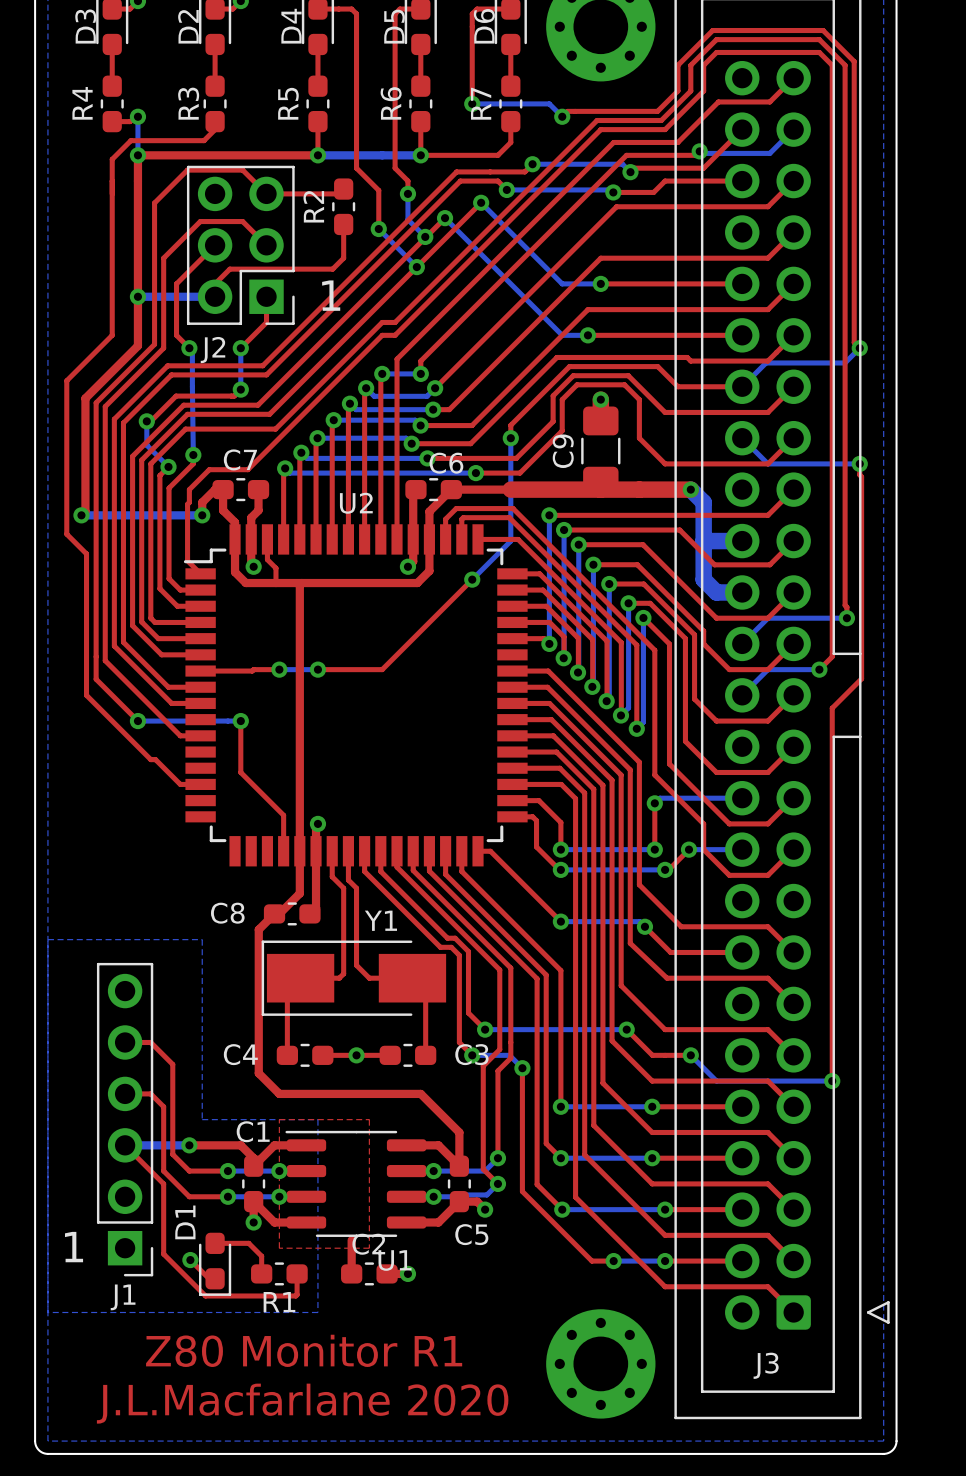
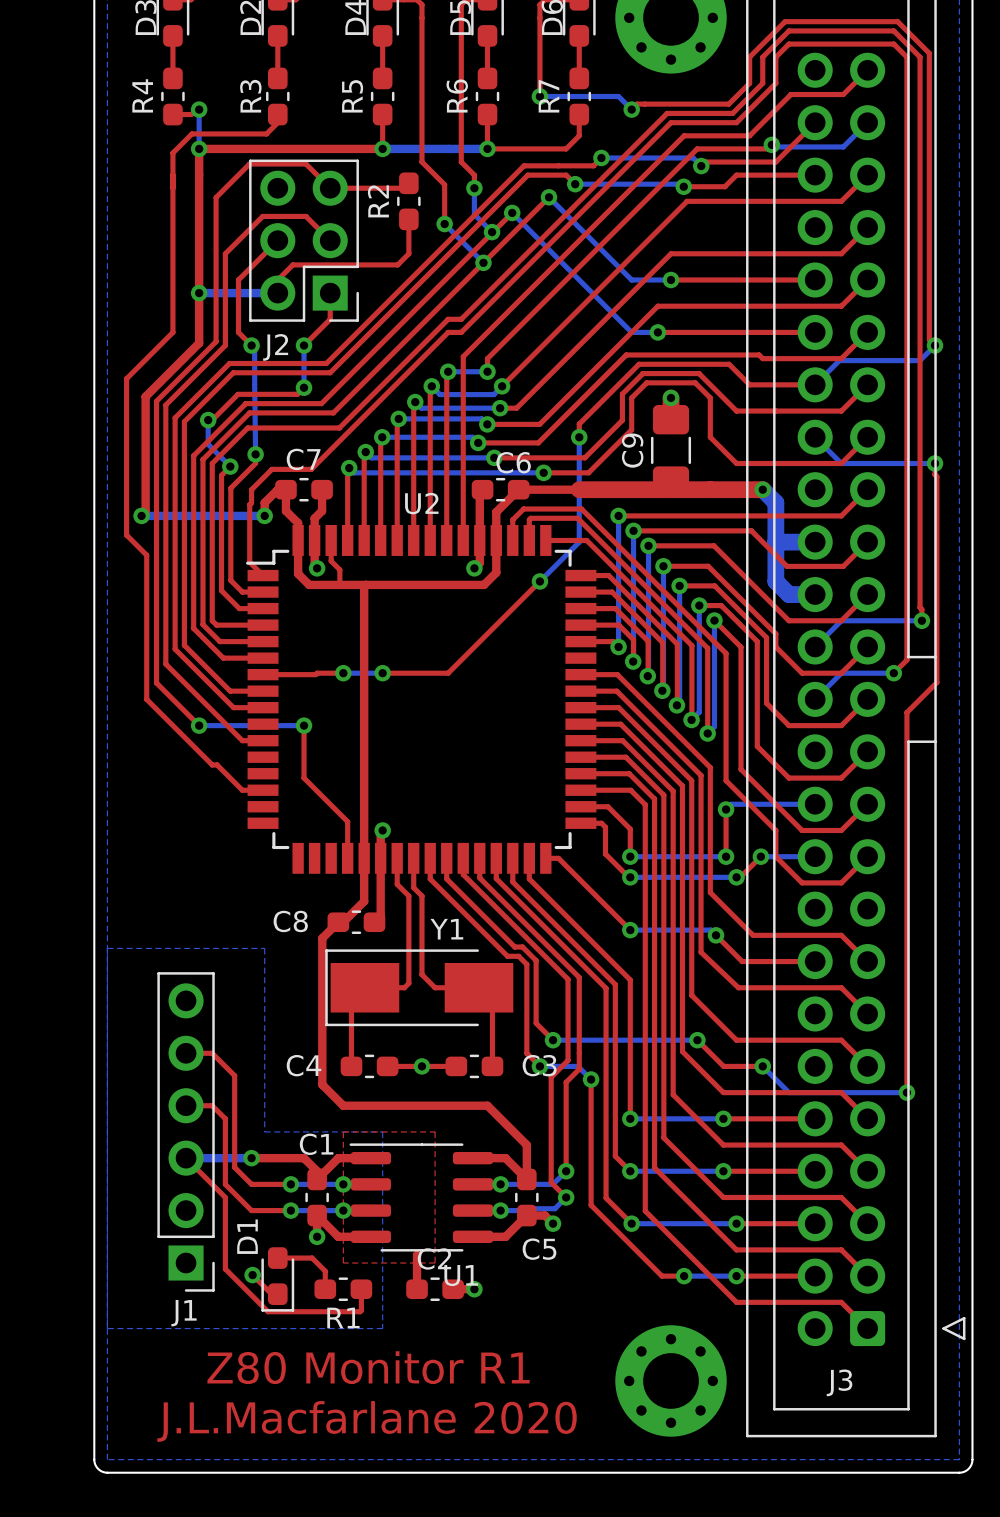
text: 1 (331, 295) -> none
text: 1 (74, 1247) -> none

